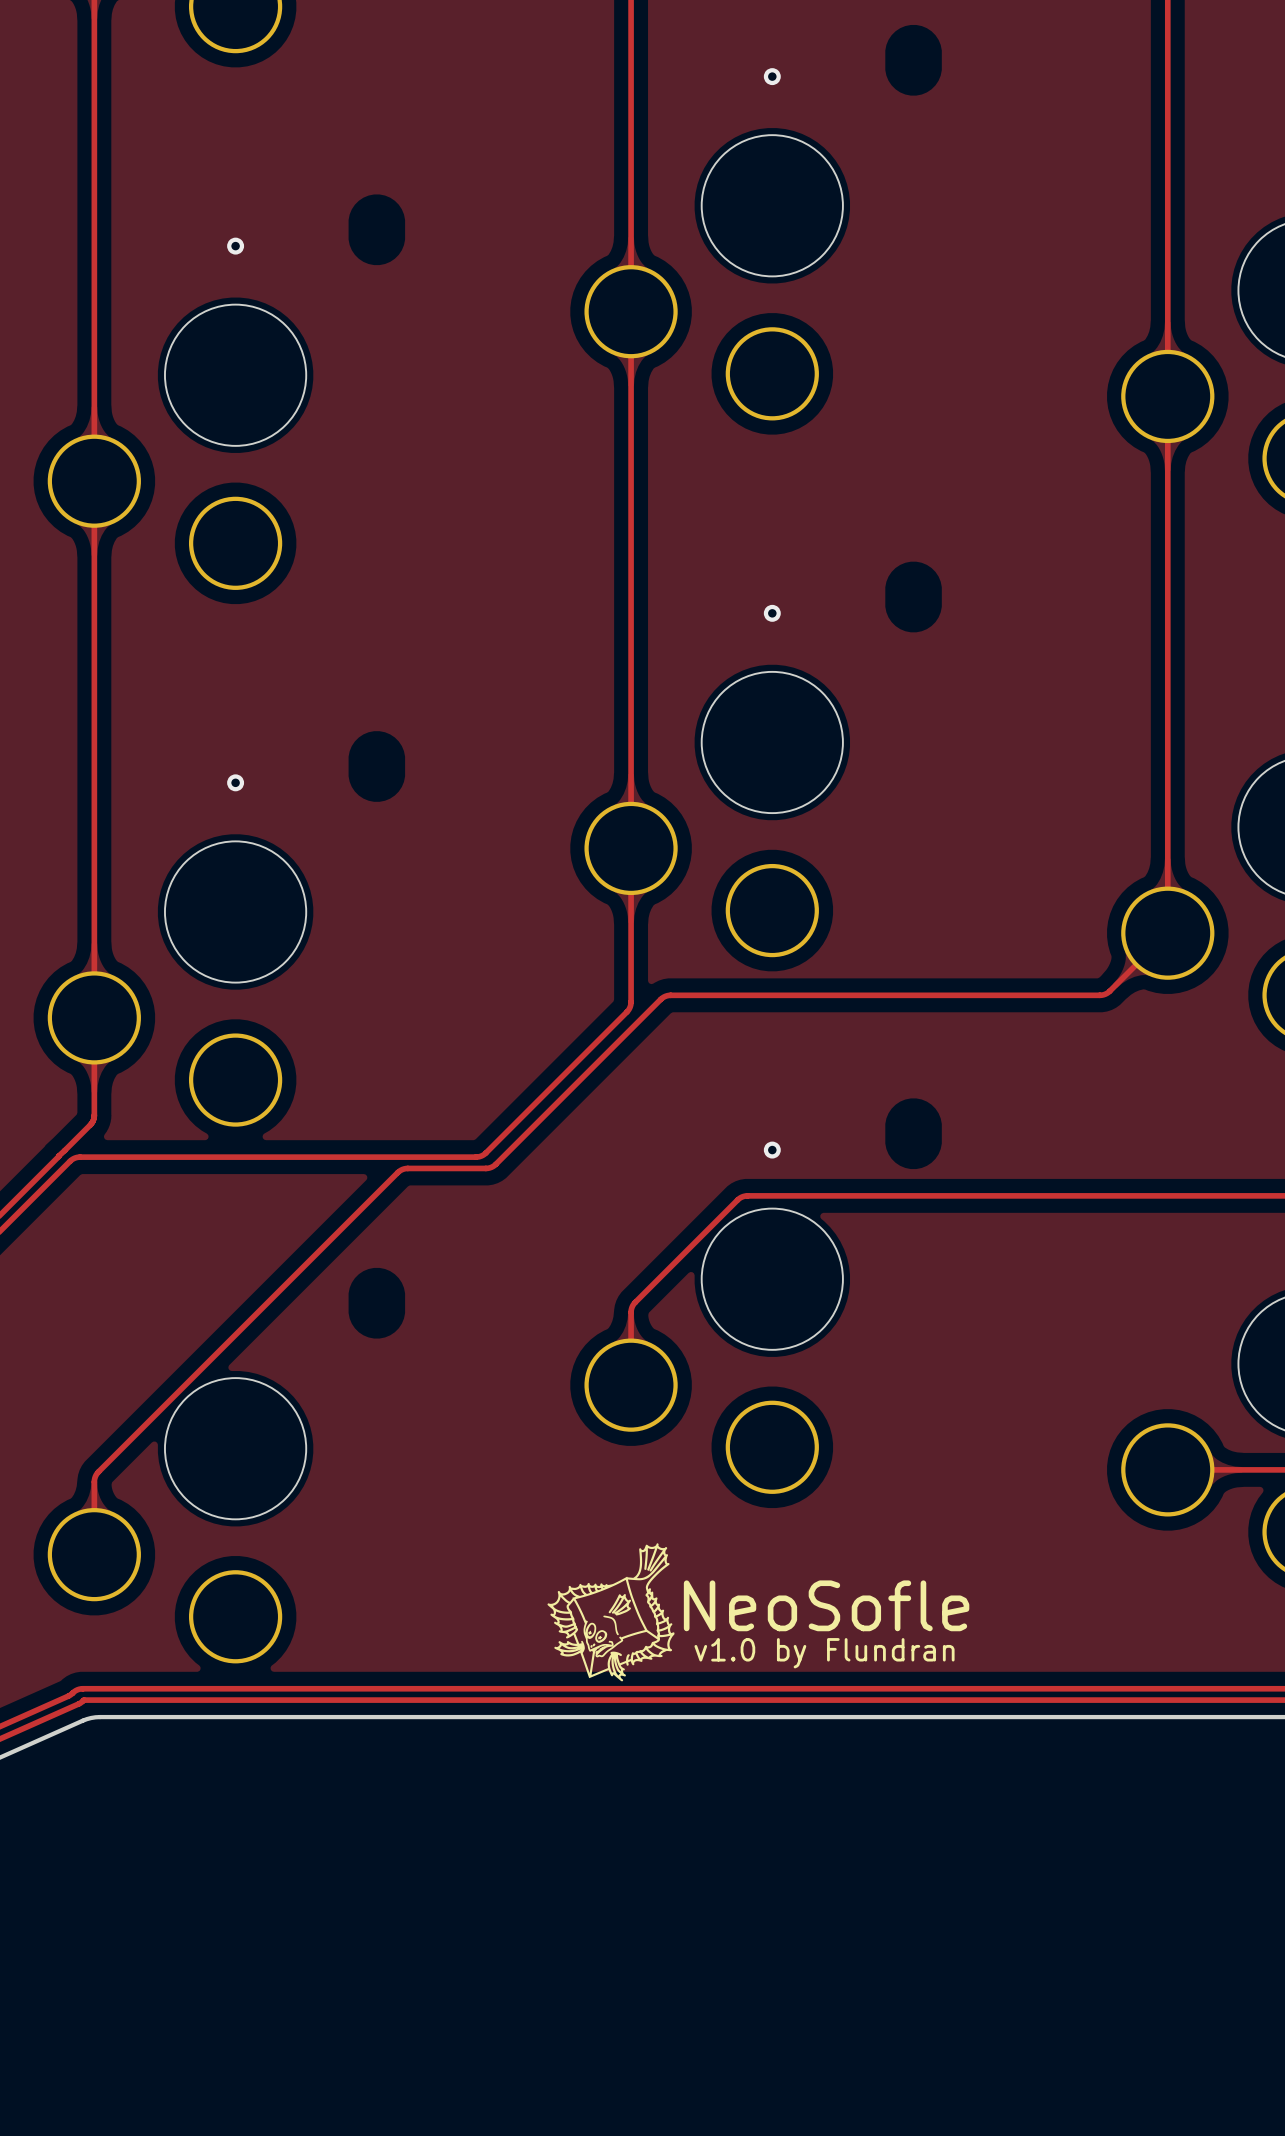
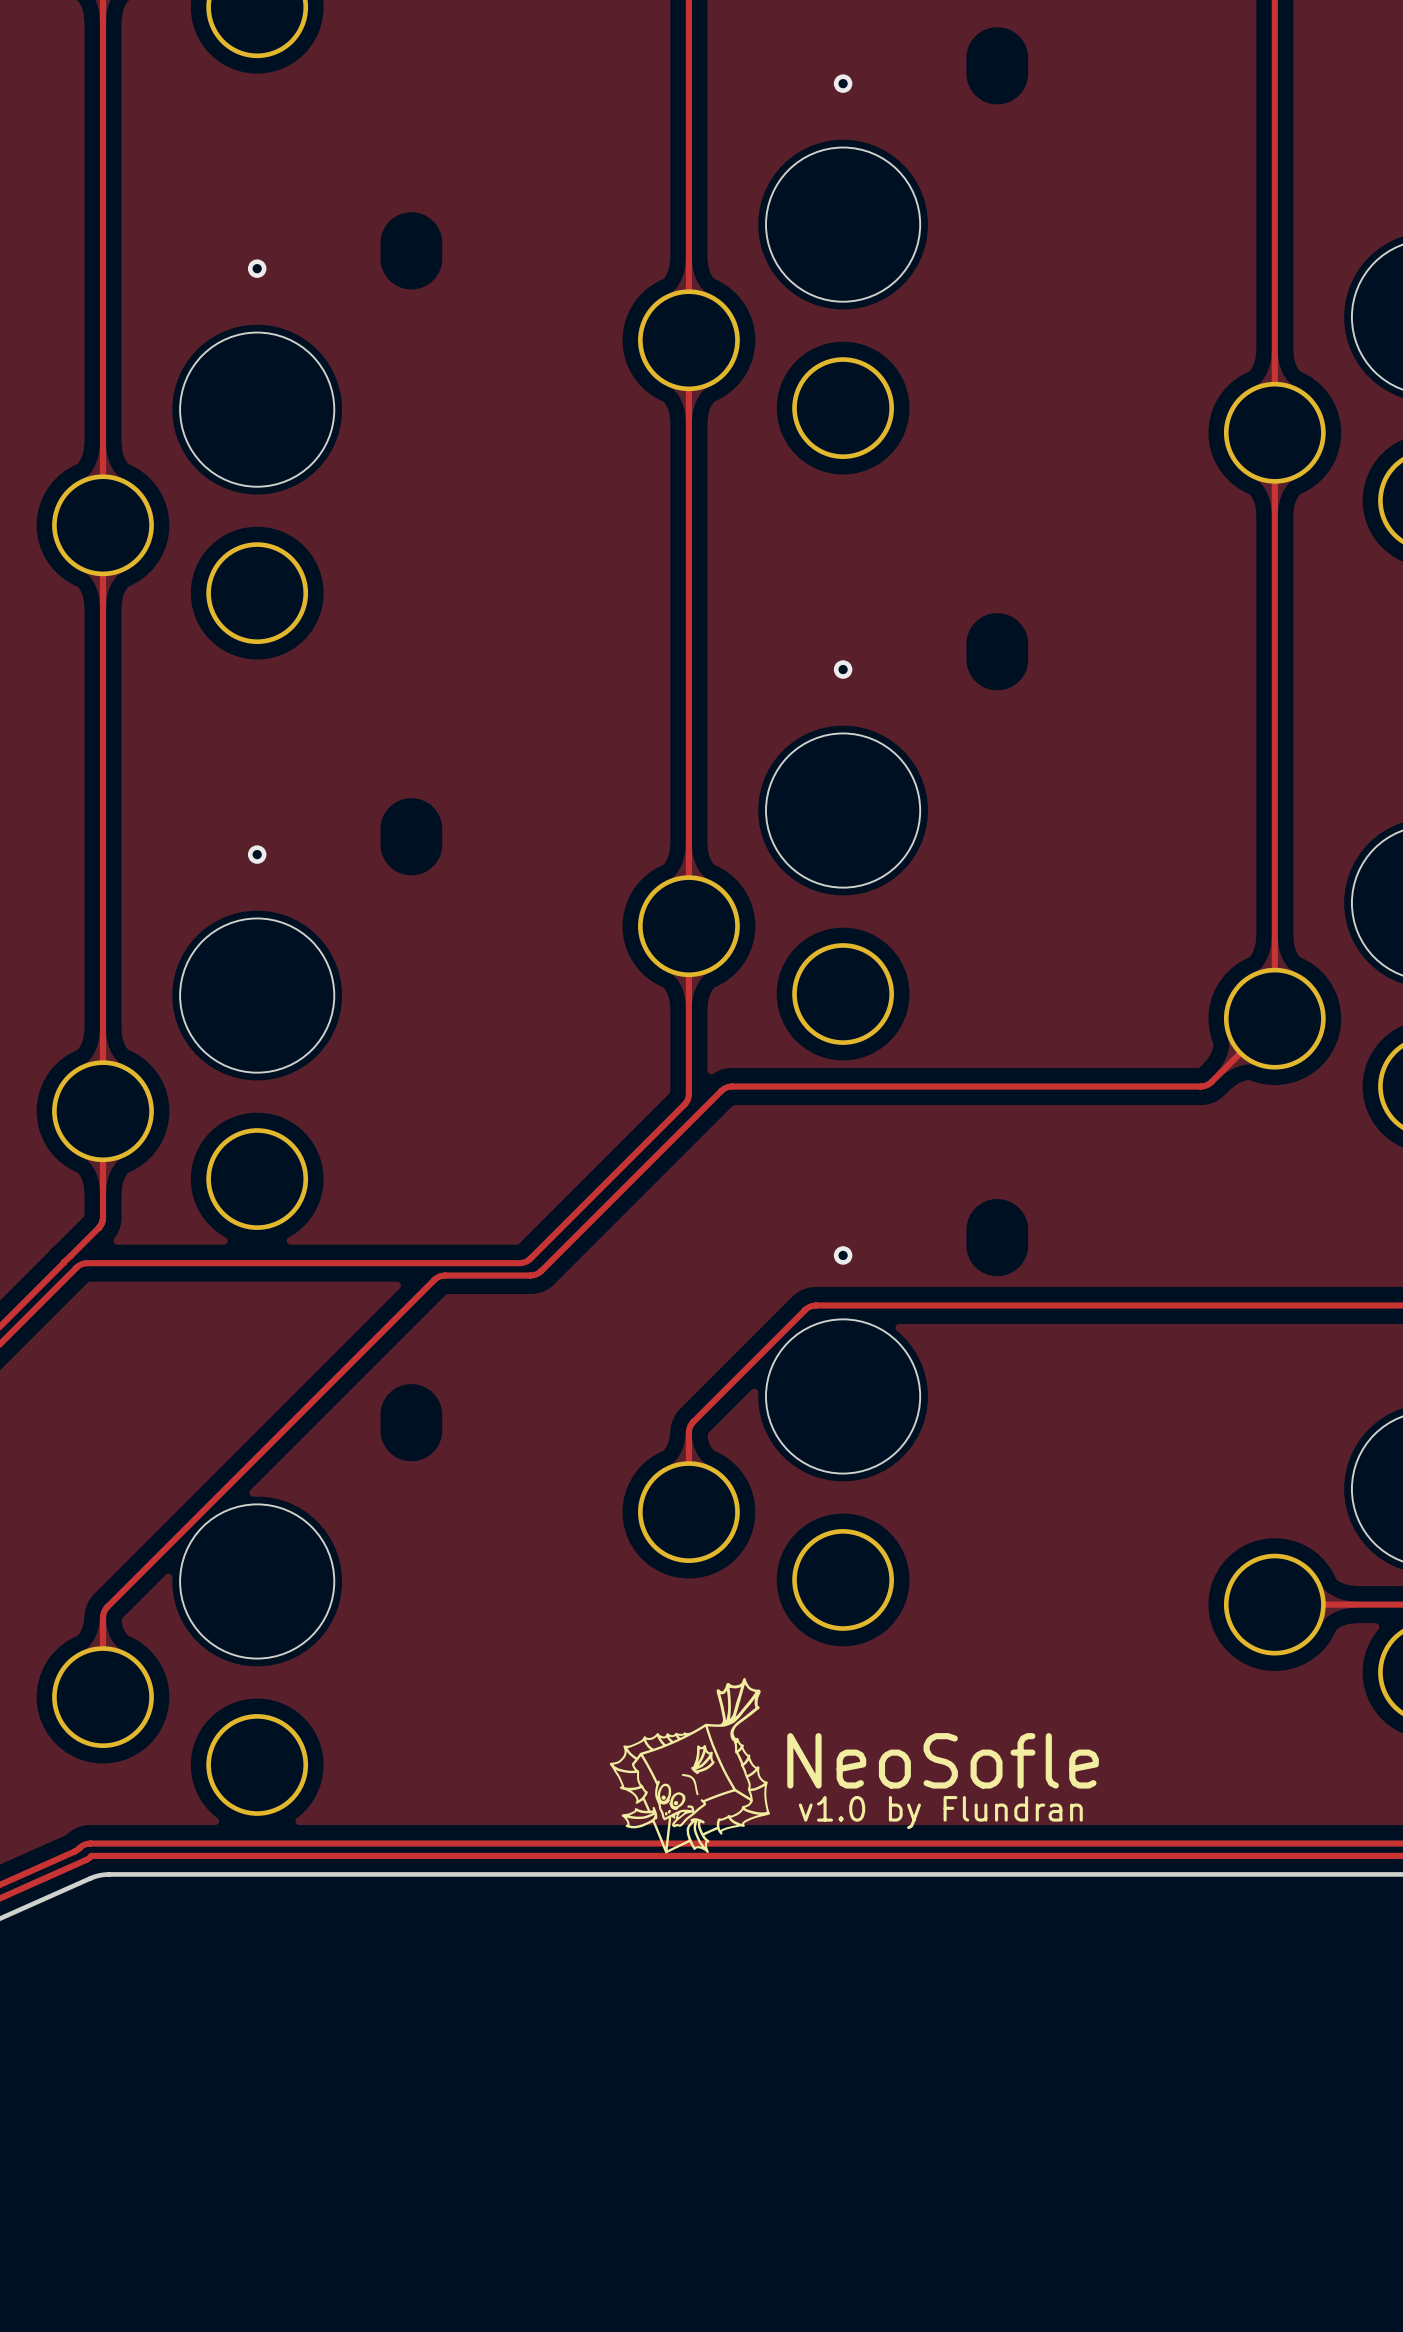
drawing shape: [547, 1543, 675, 1682] -> [609, 1677, 770, 1854]
drawing position: (826, 1605) -> (943, 1760)
text position: v1.0 by Flundran (824, 1653) -> v1.0 by Flundran (940, 1812)

